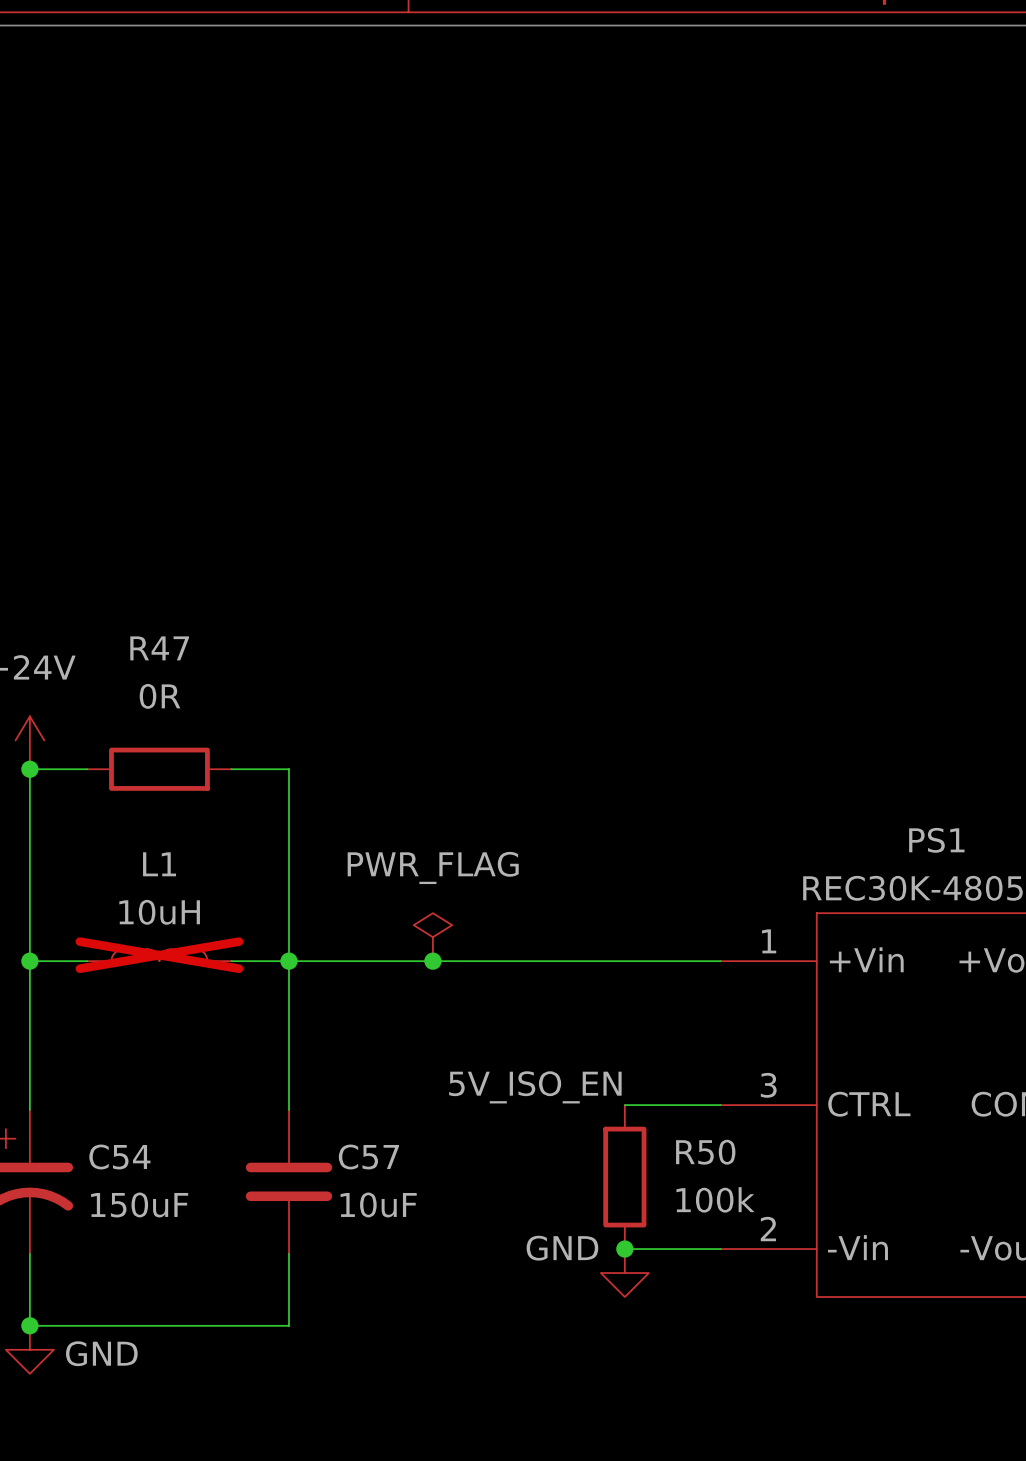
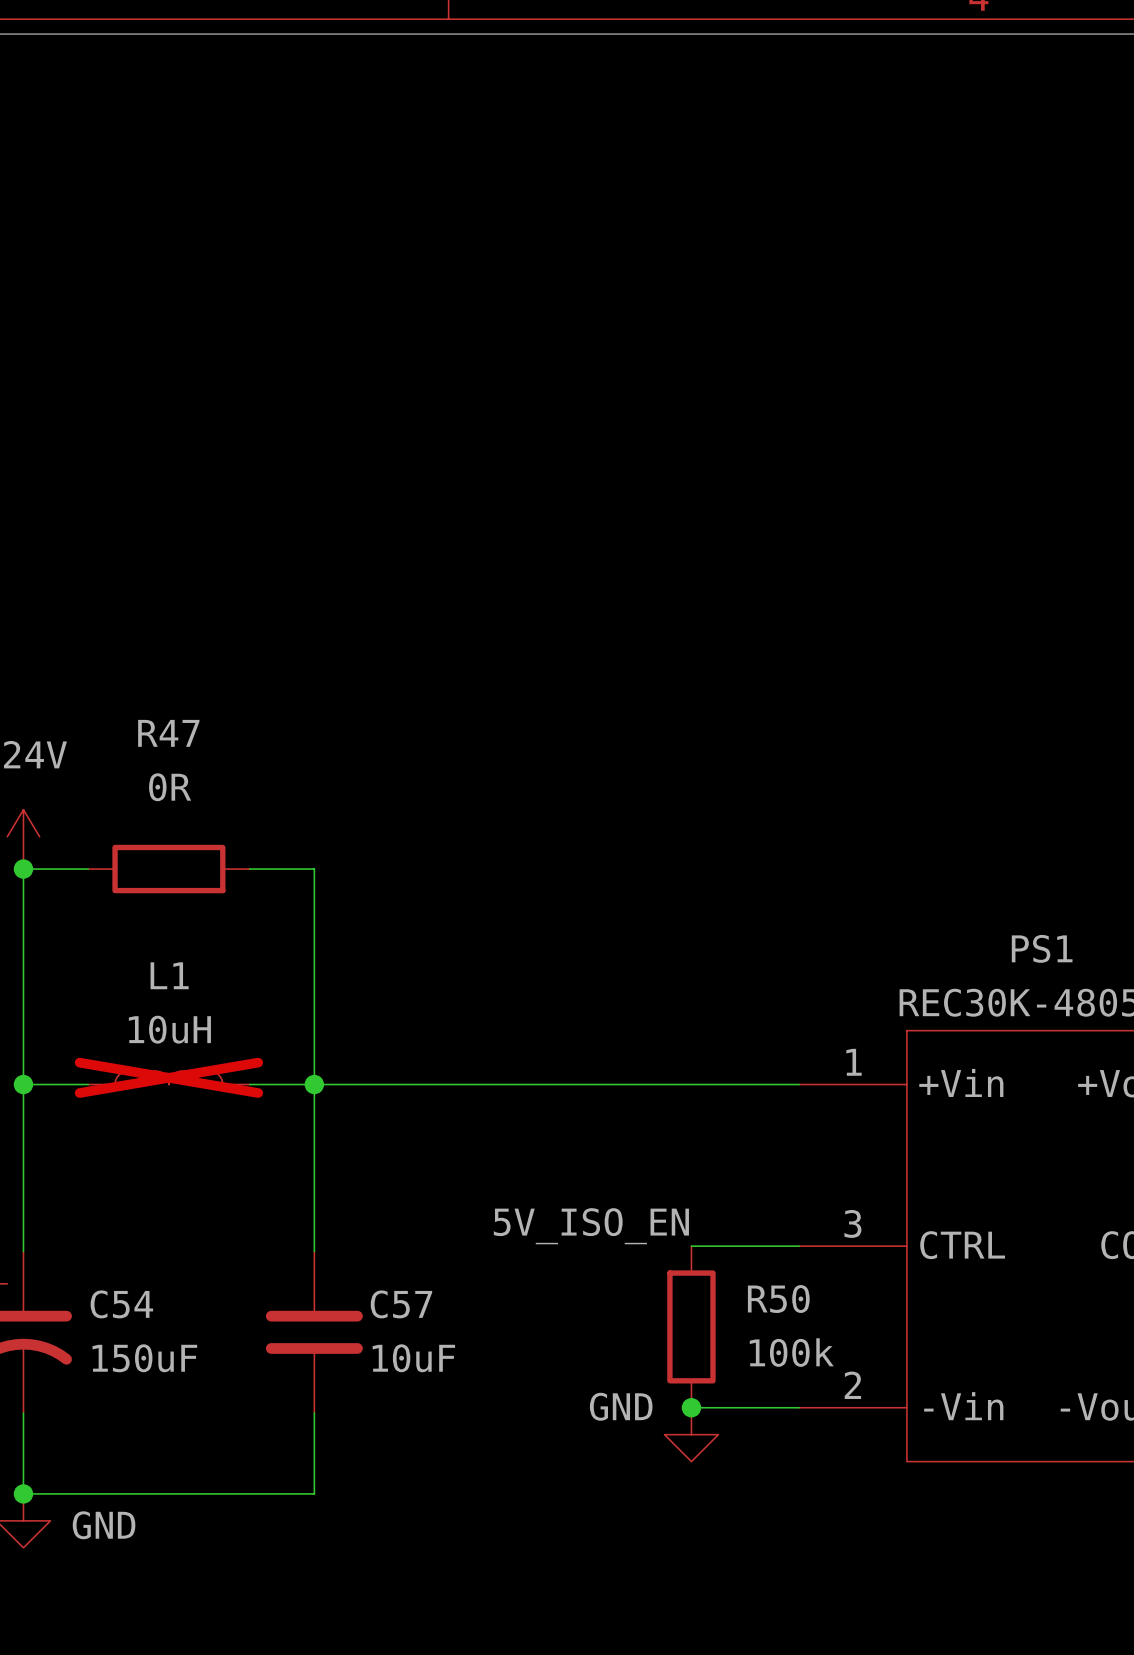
power symbol: PWR_FLAG (432, 937) -> none
junction: (432, 961) -> none

